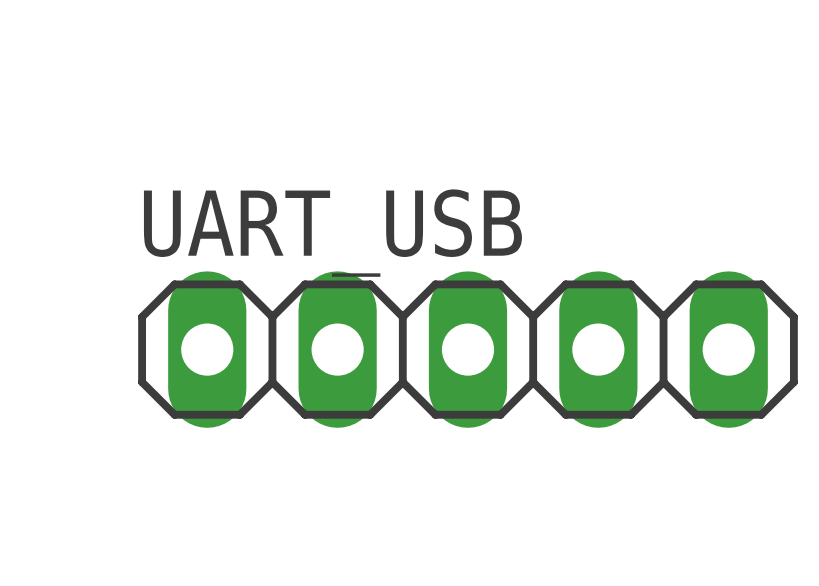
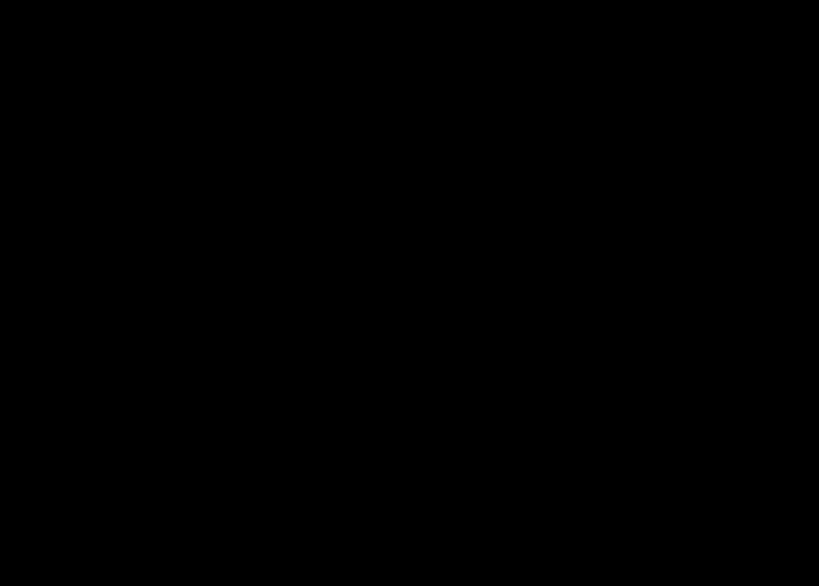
UART_USB: (467, 349) -> none

